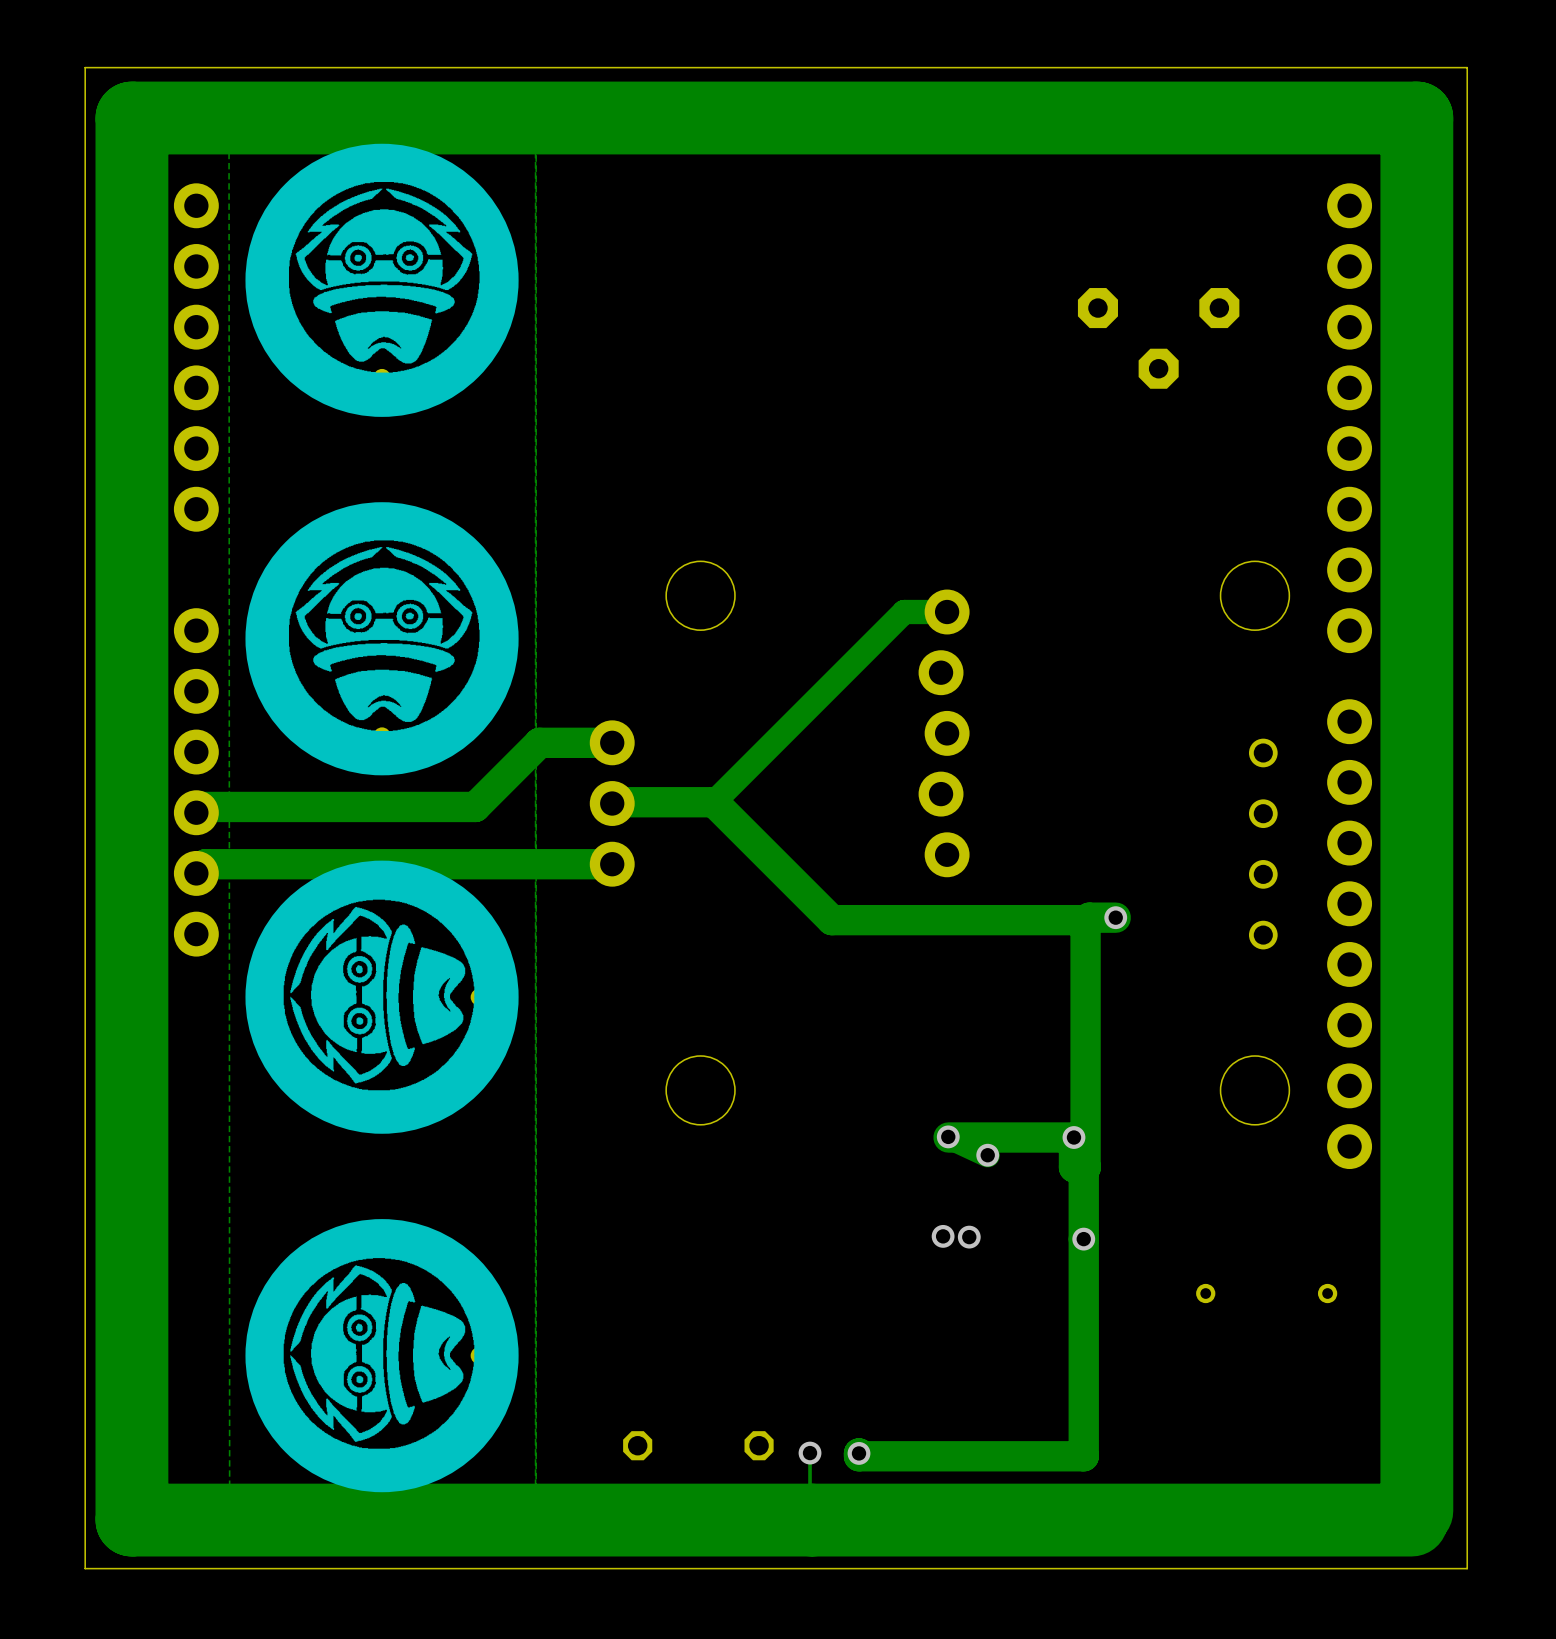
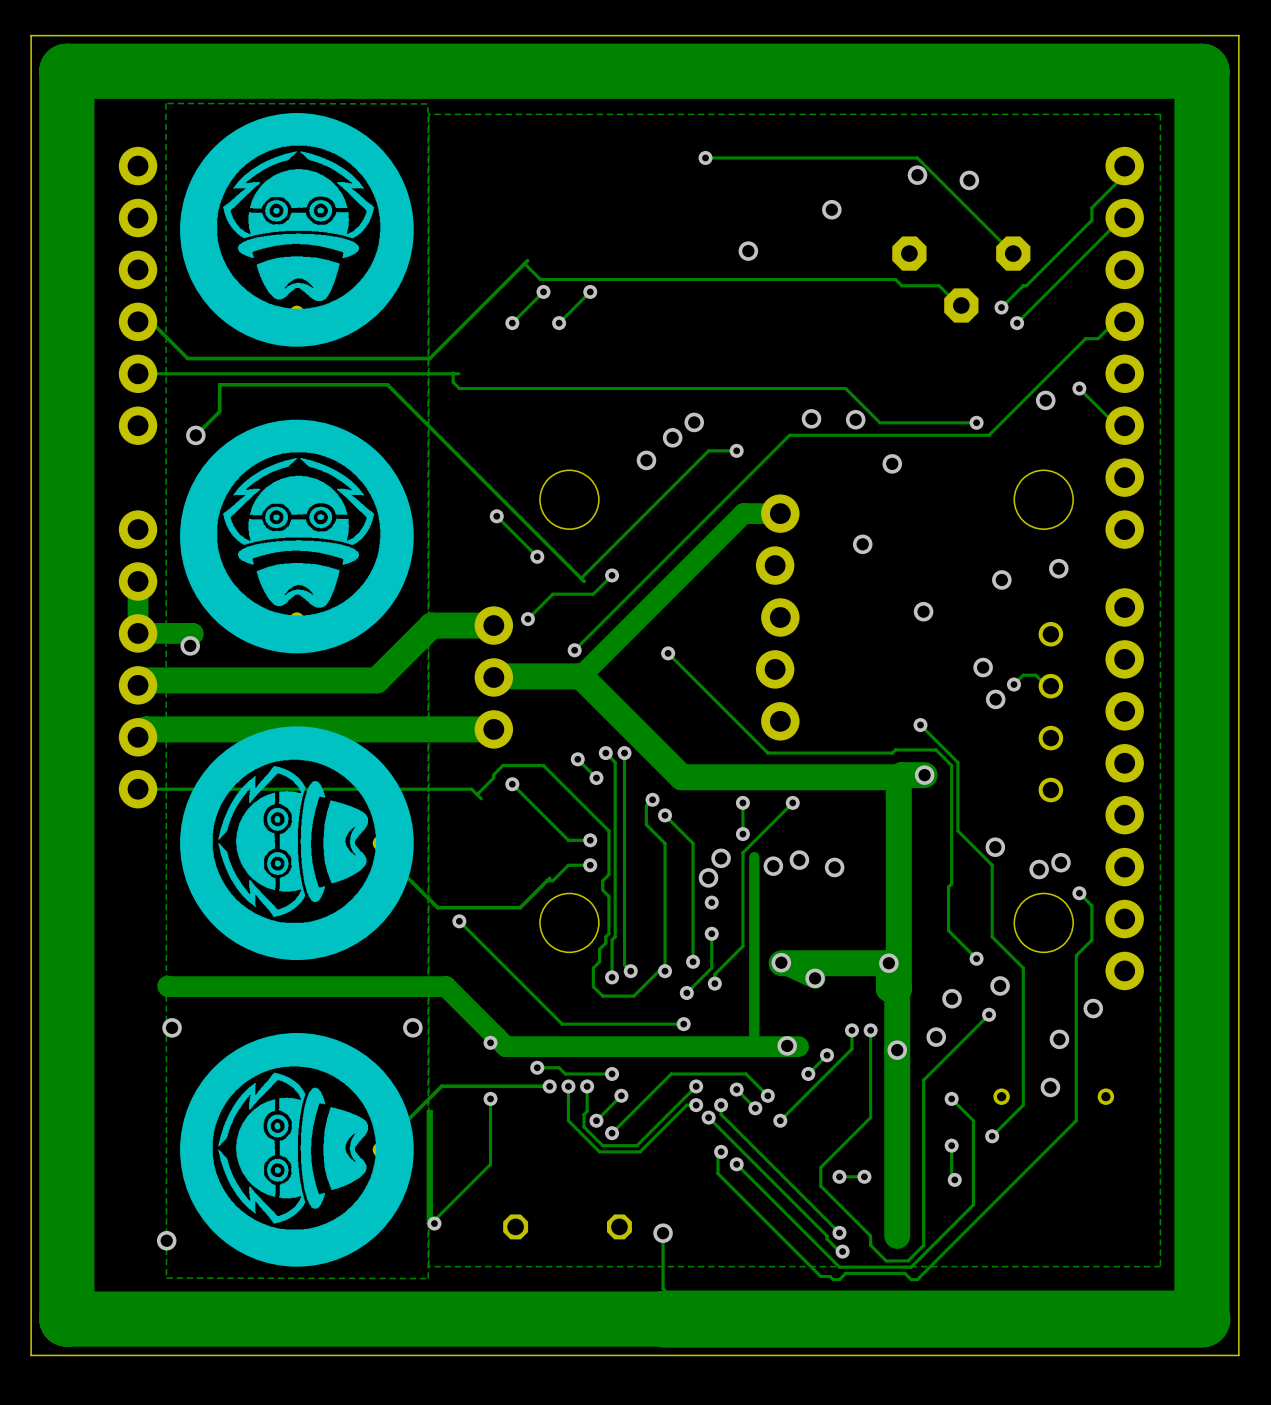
board edge: (1467, 67) (85, 67) (85, 1568) (1467, 1568) (1467, 67) -> (1238, 35) (1238, 1355) (31, 1355) (31, 35) (1238, 35)
track: none -> (1201, 71) (1201, 1319) (66, 1319) (66, 71) (1201, 71)
track: none -> (705, 157) (917, 157) (1013, 253)
via: none -> (705, 157)
track: none -> (1124, 166) (1123, 176) (1091, 207) (1091, 220) (1026, 285) (1023, 285) (1001, 307)
via: none -> (917, 175)
via: none -> (969, 180)
via: none -> (831, 209)
track: none -> (1124, 218) (1123, 217) (1017, 323)
via: none -> (748, 251)
track: none -> (527, 260) (429, 358) (187, 358) (151, 321) (138, 321)
track: none -> (524, 263) (540, 279) (895, 279) (901, 285) (939, 285) (961, 307) (961, 305)
track: none -> (543, 291) (512, 323)
via: none -> (543, 291)
track: none -> (590, 291) (559, 323)
via: none -> (590, 291)
via: none -> (1001, 307)
track: none -> (1124, 321) (1113, 323) (1098, 338) (1085, 338) (989, 435) (789, 435) (574, 650)
via: none -> (512, 323)
via: none -> (559, 323)
via: none -> (1017, 323)
track: none -> (453, 372) (453, 382) (459, 388) (845, 388) (880, 422) (976, 422)
track: none -> (458, 373) (138, 373)
track: none -> (1079, 388) (1113, 422) (1123, 422) (1124, 425)
via: none -> (1079, 388)
via: none -> (1045, 400)
via: none -> (811, 418)
via: none -> (855, 419)
via: none -> (694, 422)
via: none -> (976, 422)
track: none -> (195, 435) (219, 411) (219, 384) (387, 384) (584, 581)
via: none -> (195, 435)
via: none -> (672, 437)
track: none -> (736, 450) (708, 450) (581, 578)
via: none -> (736, 450)
via: none -> (646, 460)
via: none -> (892, 463)
track: none -> (496, 516) (537, 556)
via: none -> (496, 516)
via: none -> (862, 544)
via: none -> (537, 556)
via: none -> (1058, 568)
track: none -> (612, 575) (593, 594) (552, 594) (527, 619)
via: none -> (612, 575)
via: none -> (1001, 579)
track: none -> (138, 581) (138, 633) (193, 634)
via: none -> (923, 611)
via: none -> (527, 619)
via: none -> (190, 645)
via: none -> (574, 650)
track: none -> (668, 653) (767, 753) (892, 753) (895, 749) (936, 749) (951, 765) (951, 883) (948, 887) (948, 930) (976, 958)
via: none -> (668, 653)
via: none -> (983, 667)
track: none -> (1013, 684) (1023, 675) (1035, 675) (1048, 687) (1050, 686)
via: none -> (1013, 684)
via: none -> (995, 699)
track: none -> (920, 725) (957, 762) (957, 830) (992, 865) (992, 936) (1023, 968) (1023, 1105) (992, 1136)
via: none -> (920, 725)
track: none -> (605, 753) (615, 762) (615, 936) (612, 940) (612, 977)
via: none -> (605, 753)
track: none -> (624, 753) (624, 964) (630, 971)
via: none -> (624, 753)
track: none -> (577, 759) (596, 777)
via: none -> (577, 759)
via: none -> (596, 777)
track: none -> (512, 784) (568, 840) (590, 840)
via: none -> (512, 784)
track: none -> (138, 789) (471, 789) (481, 798)
track: none -> (477, 794) (503, 765) (543, 765) (608, 830) (608, 874) (602, 880) (602, 890) (608, 896) (608, 933) (605, 936) (605, 943) (599, 949) (599, 961) (593, 968) (593, 986) (602, 996) (633, 996) (665, 964)
track: none -> (652, 799) (646, 806) (646, 824) (665, 843) (665, 971)
via: none -> (652, 799)
track: none -> (742, 802) (742, 834)
via: none -> (742, 802)
track: none -> (792, 802) (742, 852) (742, 946) (714, 974) (714, 983)
via: none -> (792, 802)
track: none -> (665, 815) (693, 843) (693, 961)
via: none -> (665, 815)
via: none -> (742, 834)
via: none -> (590, 840)
track: none -> (379, 843) (379, 850) (437, 907) (520, 907) (549, 878)
via: none -> (995, 847)
track: none -> (754, 857) (754, 1046)
via: none -> (721, 858)
via: none -> (799, 860)
via: none -> (1060, 862)
track: none -> (590, 865) (568, 865) (552, 880) (546, 880)
via: none -> (590, 865)
via: none -> (773, 866)
via: none -> (834, 867)
via: none -> (1039, 869)
via: none -> (708, 877)
track: none -> (1079, 893) (1091, 905) (1091, 940) (1076, 955) (1076, 1120) (917, 1279) (911, 1279) (904, 1273) (845, 1273) (839, 1279) (833, 1279) (830, 1276) (820, 1276) (717, 1173) (717, 1154) (721, 1151)
via: none -> (1079, 893)
via: none -> (711, 902)
track: none -> (459, 921) (562, 1024) (683, 1024)
via: none -> (459, 921)
track: none -> (711, 933) (711, 968) (686, 992)
via: none -> (711, 933)
via: none -> (976, 958)
via: none -> (693, 961)
via: none -> (630, 971)
via: none -> (665, 971)
via: none -> (612, 977)
via: none -> (714, 983)
track: none -> (167, 985) (445, 986) (505, 1046) (798, 1046)
via: none -> (1000, 985)
via: none -> (686, 992)
via: none -> (952, 998)
via: none -> (1093, 1008)
track: none -> (989, 1014) (923, 1080) (923, 1245) (908, 1260) (886, 1260) (870, 1245) (870, 1236) (820, 1186) (820, 1167) (870, 1117) (870, 1030)
via: none -> (989, 1014)
via: none -> (683, 1024)
via: none -> (172, 1027)
via: none -> (412, 1027)
track: none -> (851, 1030) (851, 1049) (780, 1120)
via: none -> (851, 1030)
via: none -> (870, 1030)
via: none -> (936, 1037)
via: none -> (1059, 1039)
via: none -> (490, 1042)
via: none -> (787, 1045)
via: (943, 1236) -> none
via: (969, 1237) -> none
track: none -> (827, 1055) (808, 1073)
via: none -> (827, 1055)
track: none -> (537, 1067) (559, 1067) (565, 1073) (612, 1073)
via: none -> (537, 1067)
via: none -> (612, 1073)
via: none -> (808, 1073)
via: none -> (549, 1086)
track: none -> (568, 1086) (568, 1120) (599, 1151) (640, 1151) (686, 1105) (696, 1105)
via: none -> (568, 1086)
via: none -> (587, 1086)
track: none -> (696, 1086) (636, 1145) (602, 1145) (584, 1126) (584, 1114) (587, 1111) (587, 1086)
via: none -> (696, 1086)
via: none -> (1050, 1087)
track: none -> (551, 1088) (549, 1086) (441, 1086) (379, 1149)
track: none -> (736, 1089) (755, 1108)
via: none -> (736, 1089)
track: none -> (621, 1095) (596, 1120)
via: none -> (621, 1095)
track: none -> (767, 1095) (746, 1073) (671, 1073) (612, 1133)
via: none -> (767, 1095)
track: none -> (490, 1098) (490, 1164) (434, 1220) (431, 1220) (431, 1111) (428, 1111) (428, 1223) (434, 1223)
via: none -> (490, 1098)
track: none -> (951, 1098) (973, 1120) (973, 1204) (911, 1267) (839, 1267) (736, 1164)
via: none -> (951, 1098)
via: none -> (696, 1105)
track: none -> (721, 1105) (721, 1114) (839, 1232)
via: none -> (721, 1105)
via: none -> (755, 1108)
track: none -> (708, 1117) (827, 1236) (827, 1239) (839, 1251) (842, 1251)
via: none -> (708, 1117)
via: none -> (596, 1120)
via: none -> (780, 1120)
via: none -> (612, 1133)
via: none -> (992, 1136)
track: none -> (951, 1145) (951, 1176) (954, 1179)
via: none -> (951, 1145)
via: none -> (721, 1151)
via: none -> (736, 1164)
via: none -> (839, 1176)
track: none -> (864, 1176) (839, 1176)
via: none -> (864, 1176)
via: none -> (954, 1179)
via: none -> (434, 1223)
via: none -> (839, 1232)
track: (858, 1453) (858, 1456) (1083, 1456) -> none
via: (858, 1453) -> none
via: none -> (166, 1240)
via: none -> (842, 1251)
track: (1416, 1510) (1416, 118) (131, 118) (131, 1520) (1411, 1520) -> none

